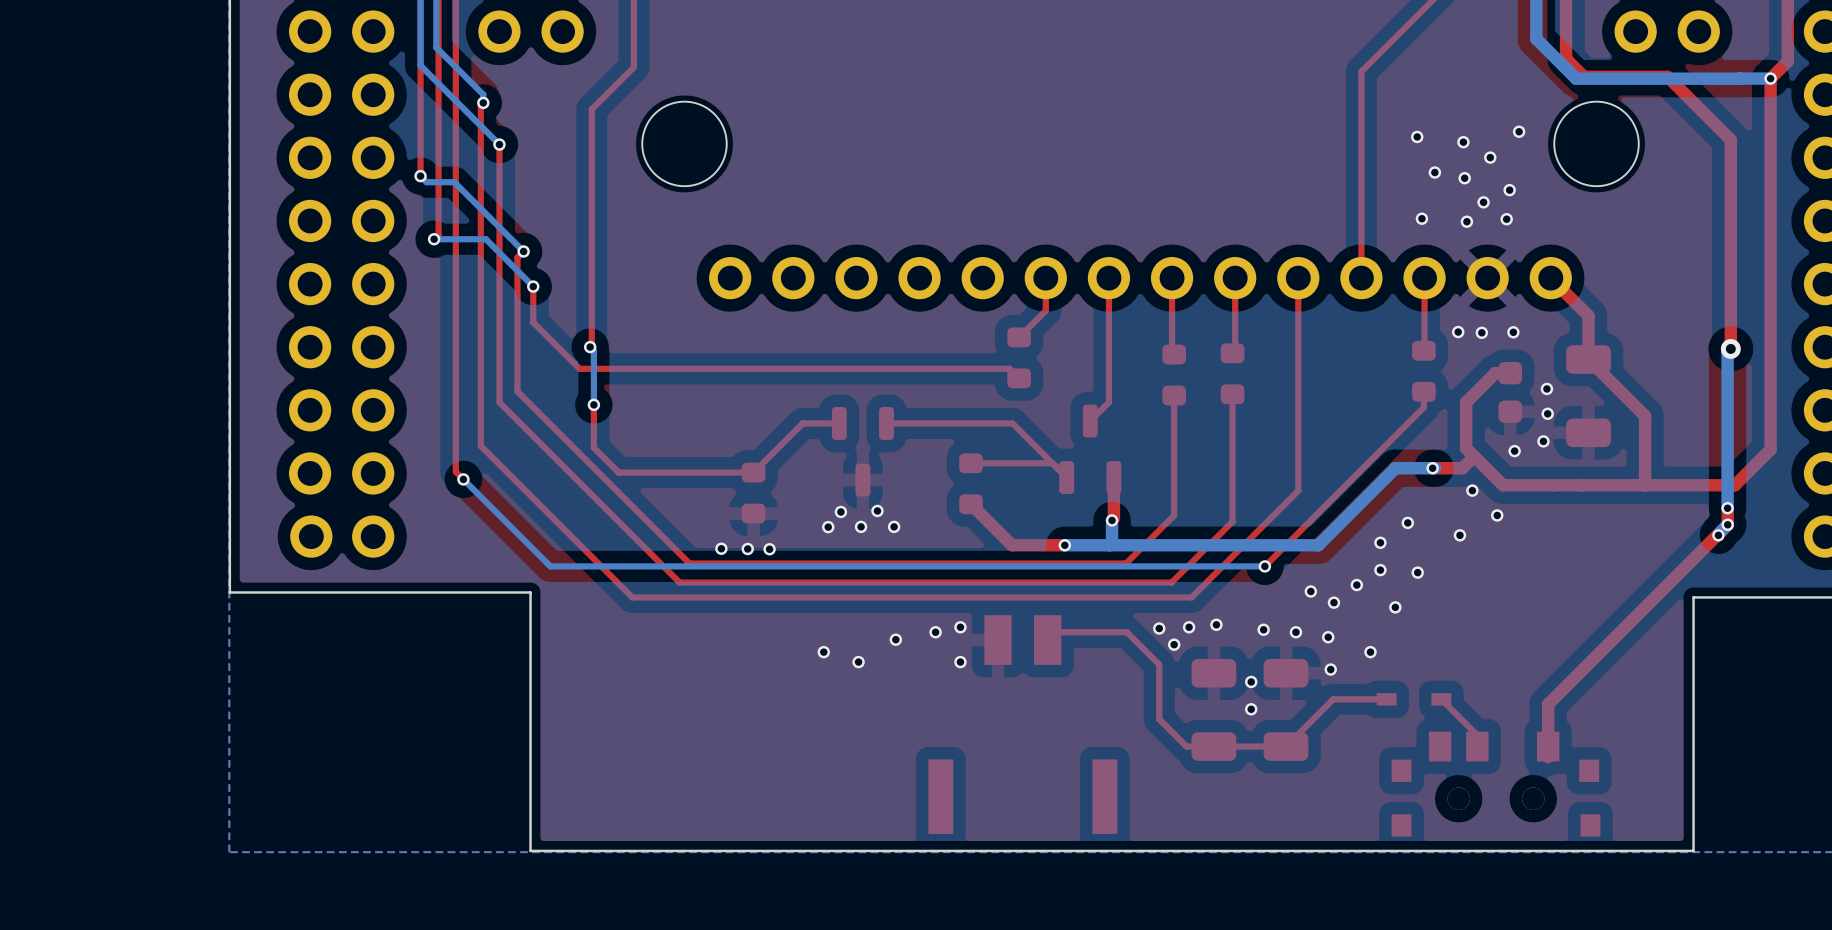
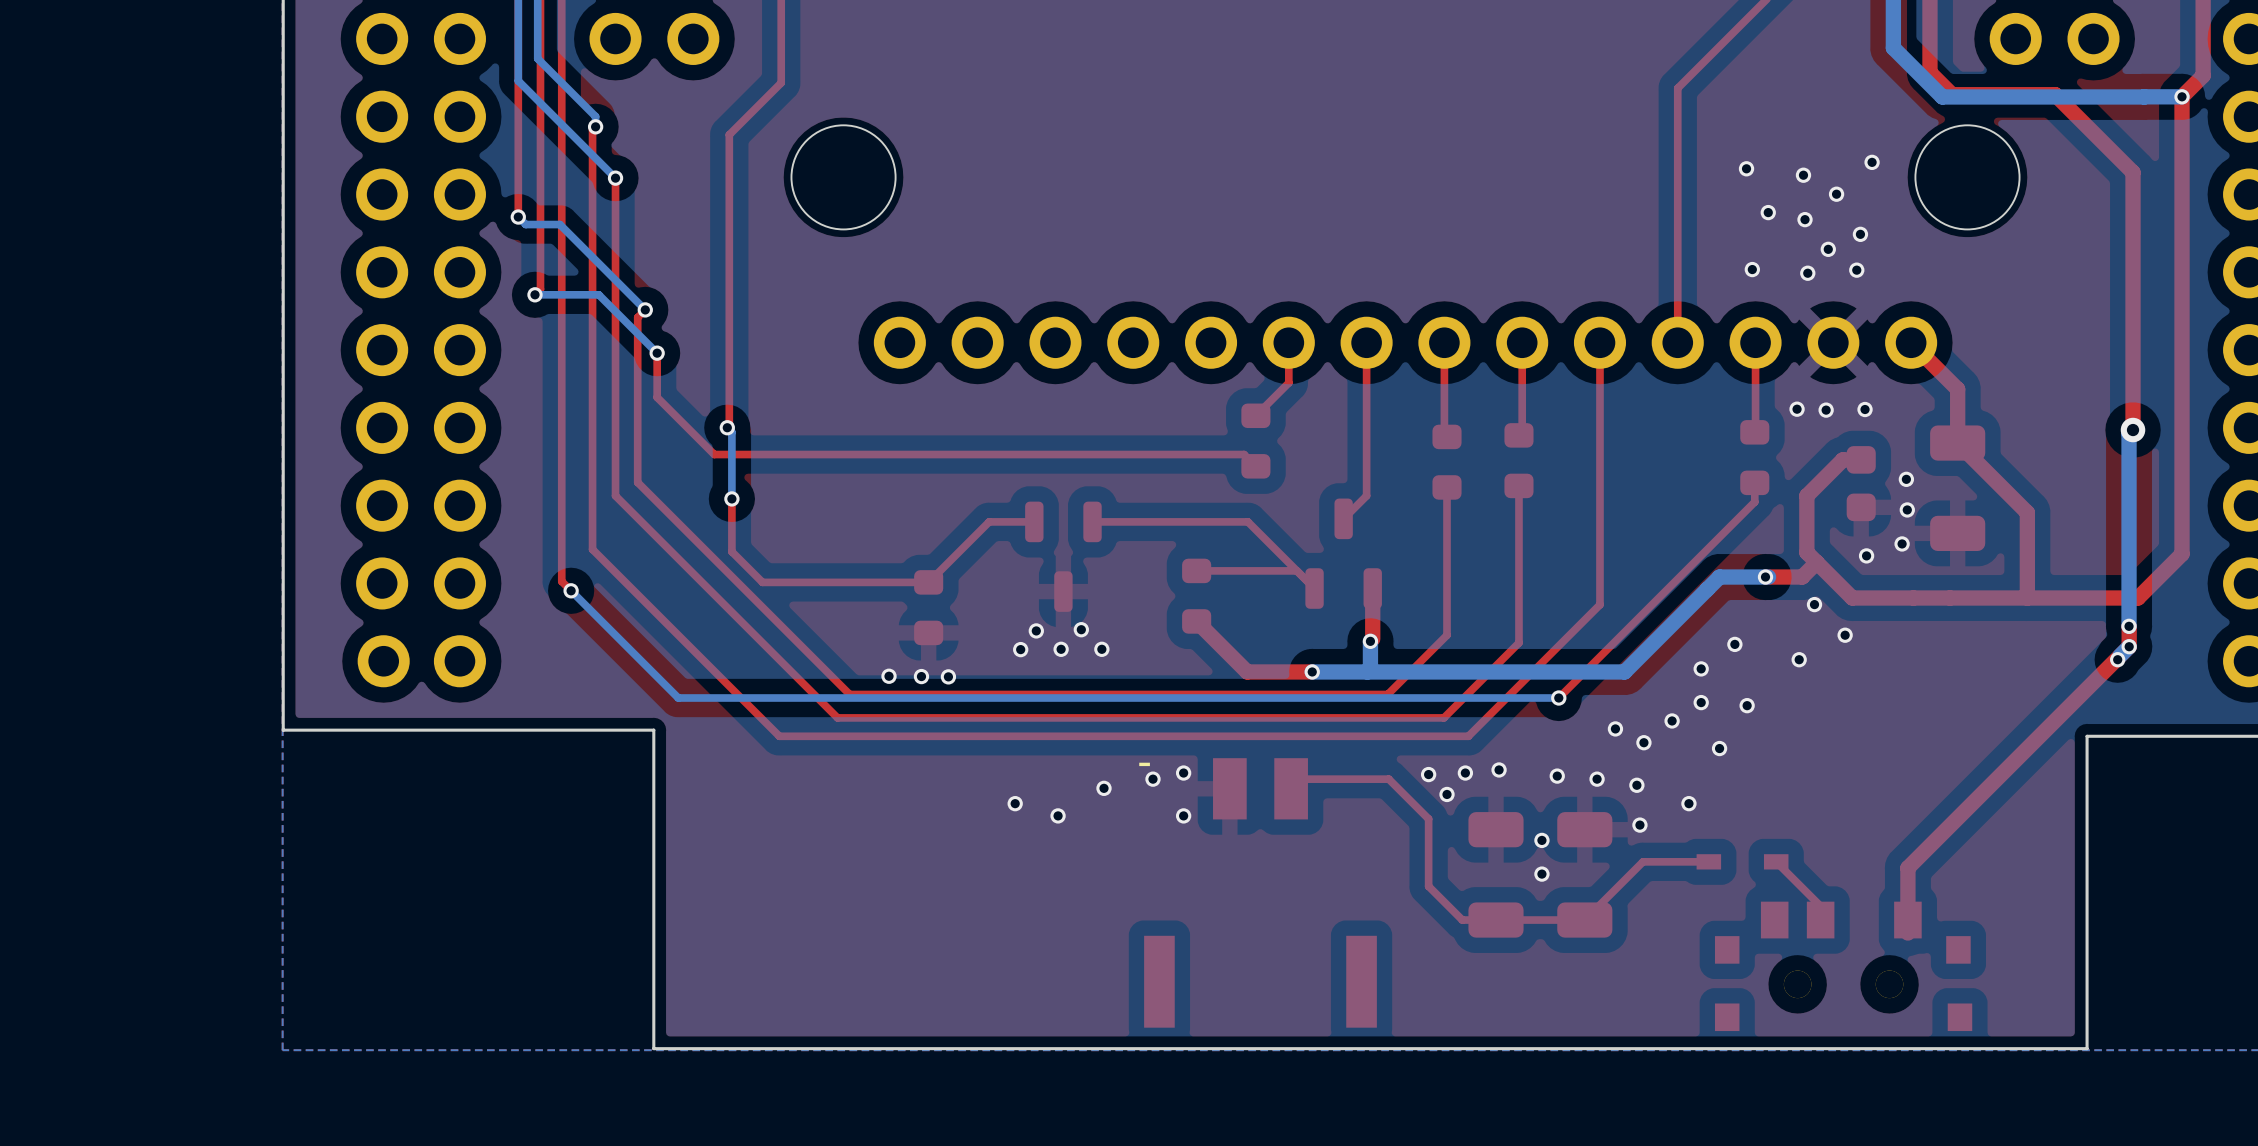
text: none -> - (1144, 764)

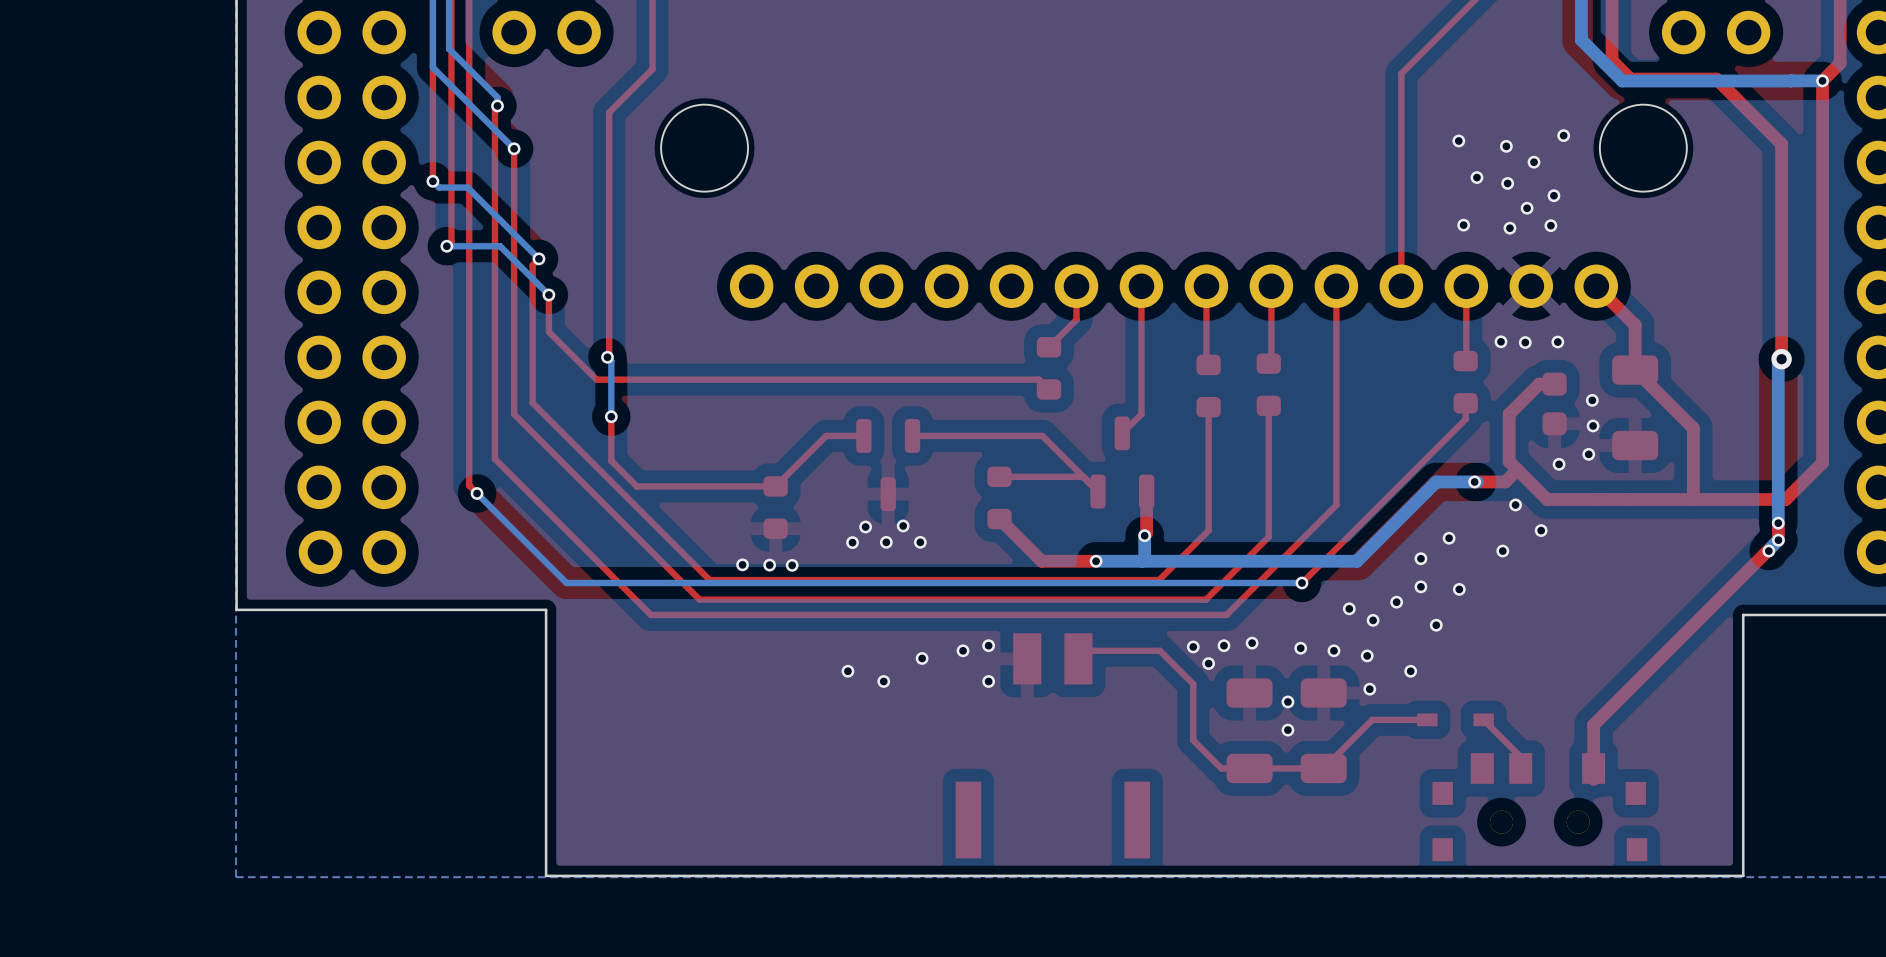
text: - (1144, 764) -> none

